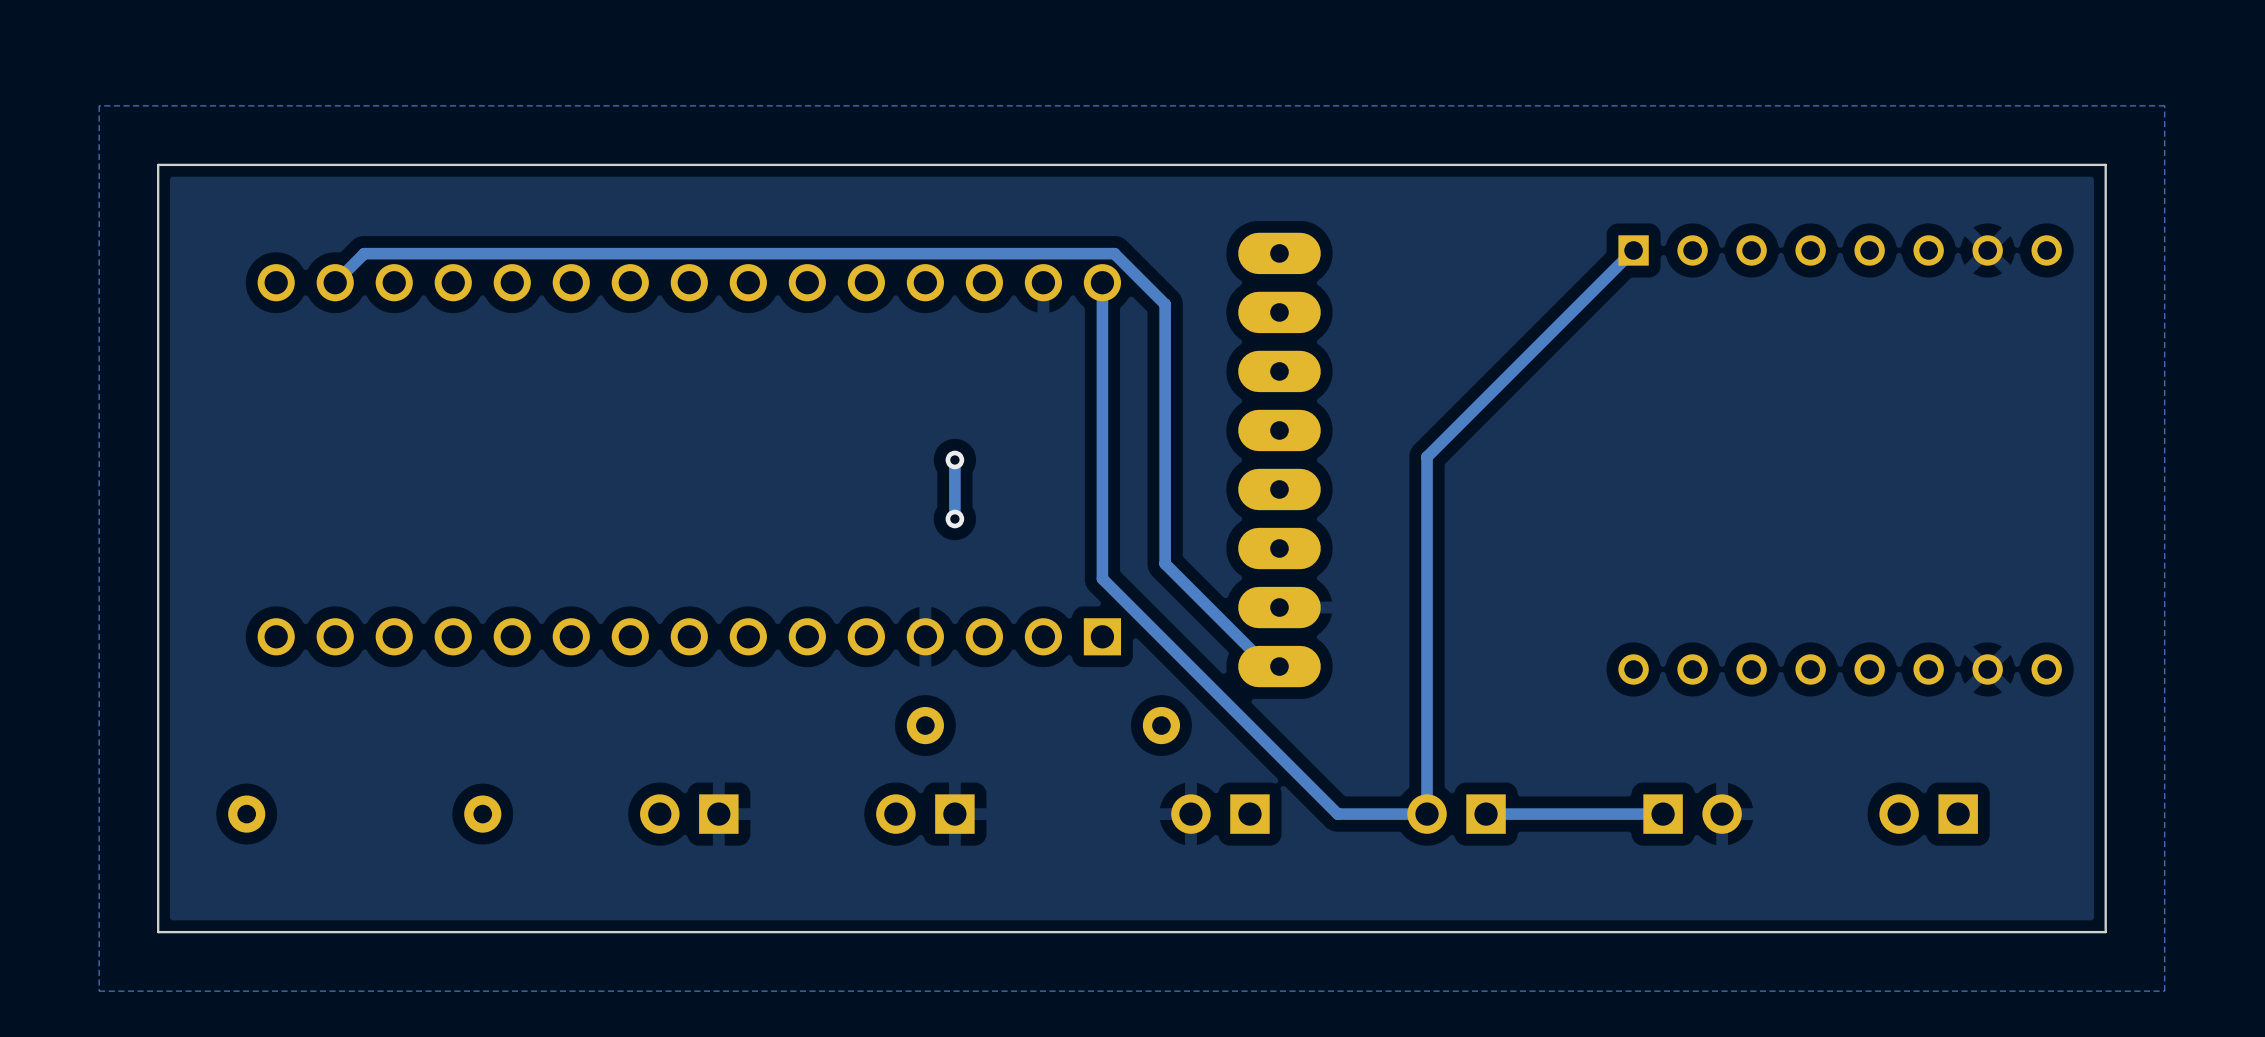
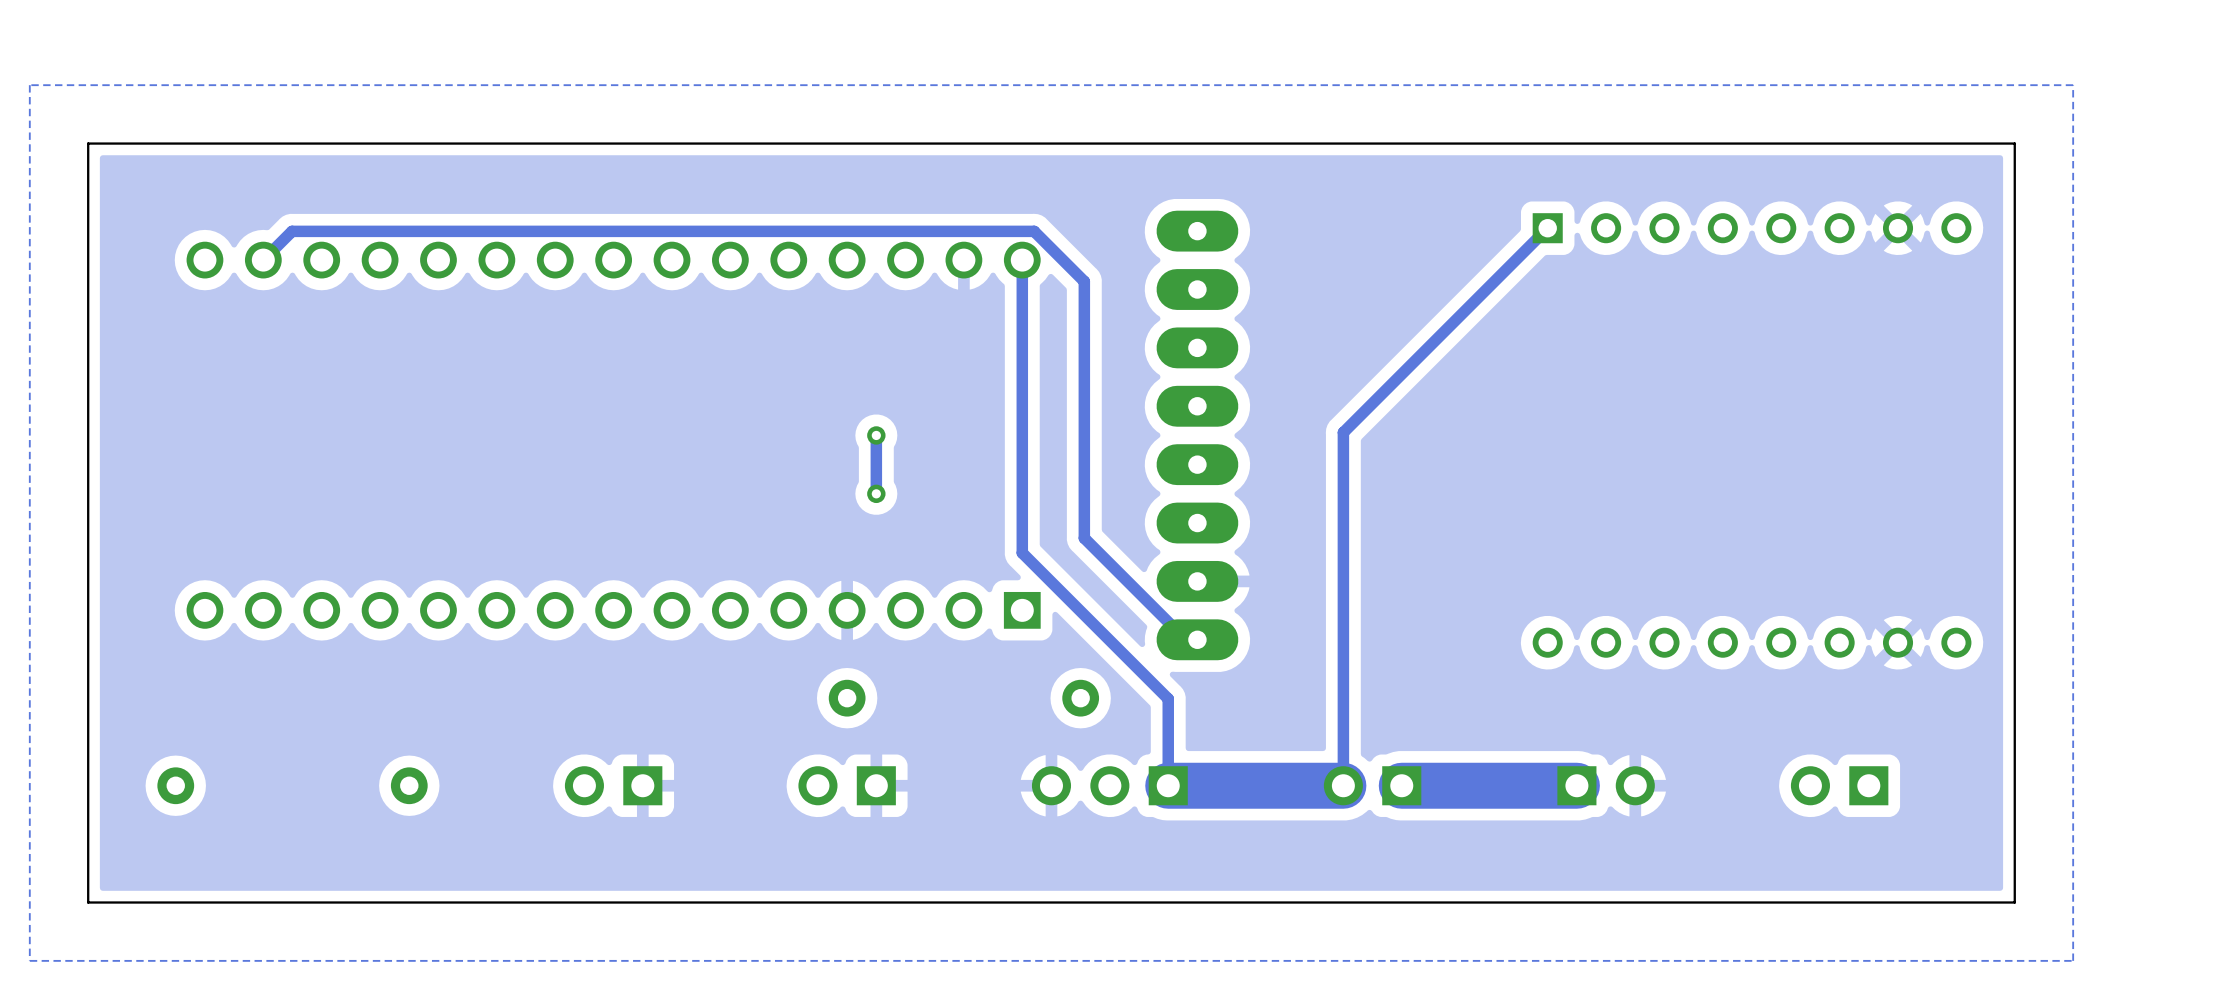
track: (1249, 726) (1337, 814) -> (1168, 698) (1168, 785) (1255, 785)
part: none -> (1109, 785)
part: (1220, 814) -> none
track width: thin (1427, 814) (1337, 814) -> thick (1343, 785) (1255, 785)
track width: thin (1663, 814) (1486, 814) -> thick (1576, 785) (1401, 785)

